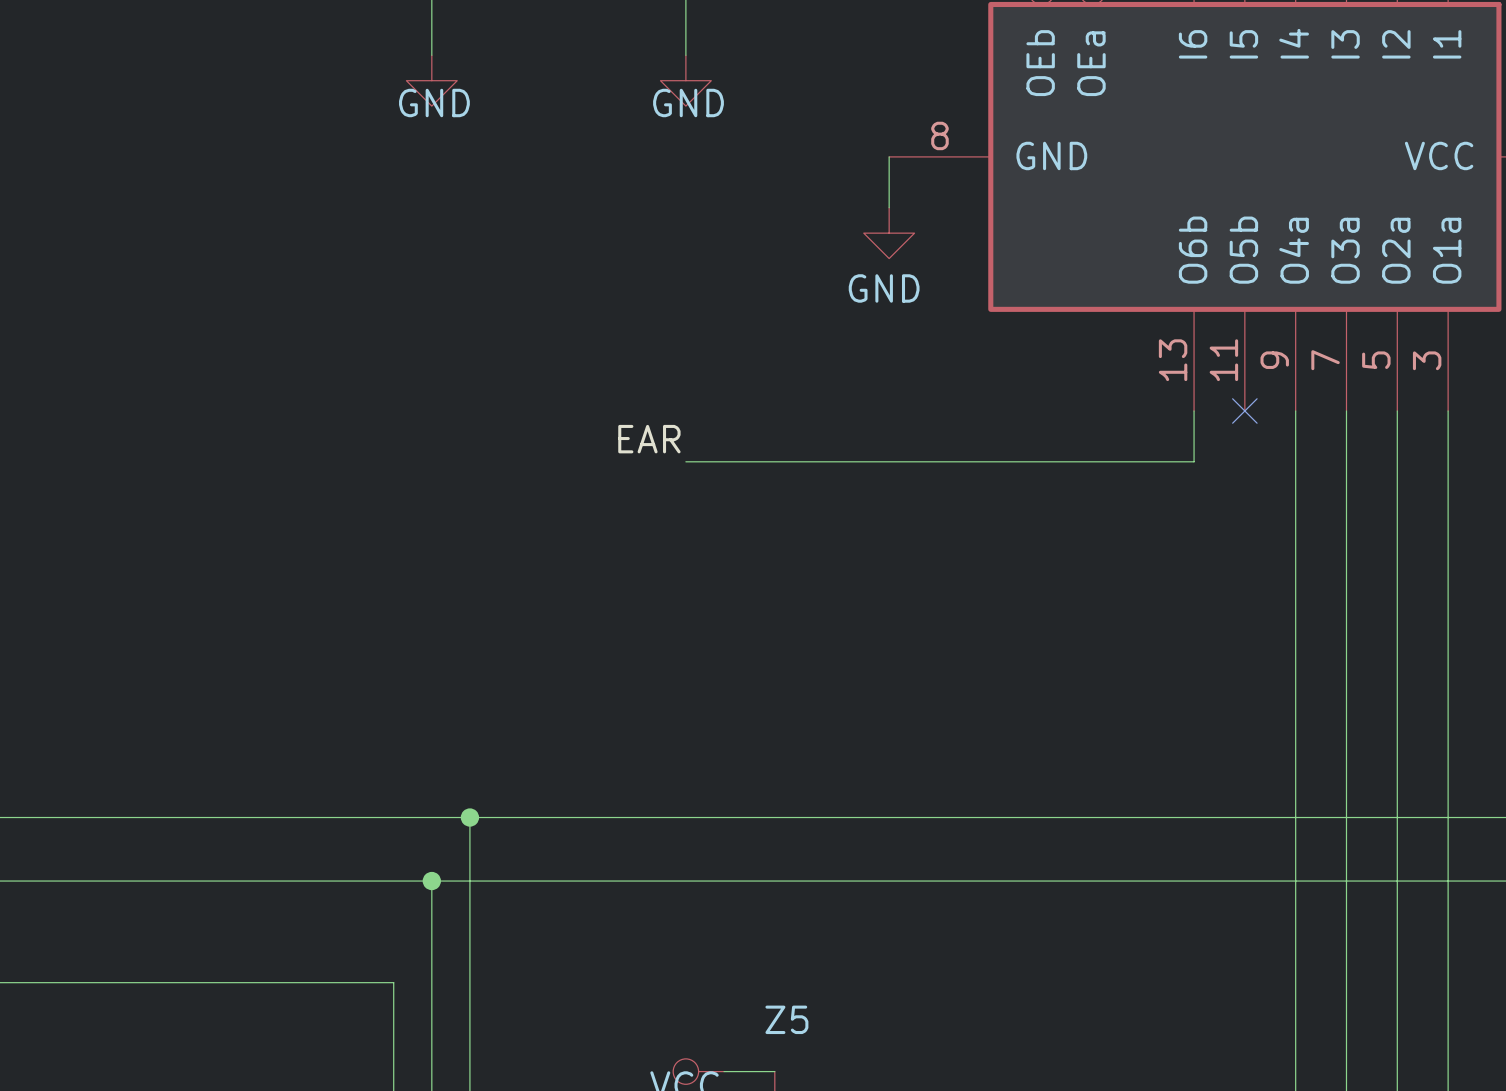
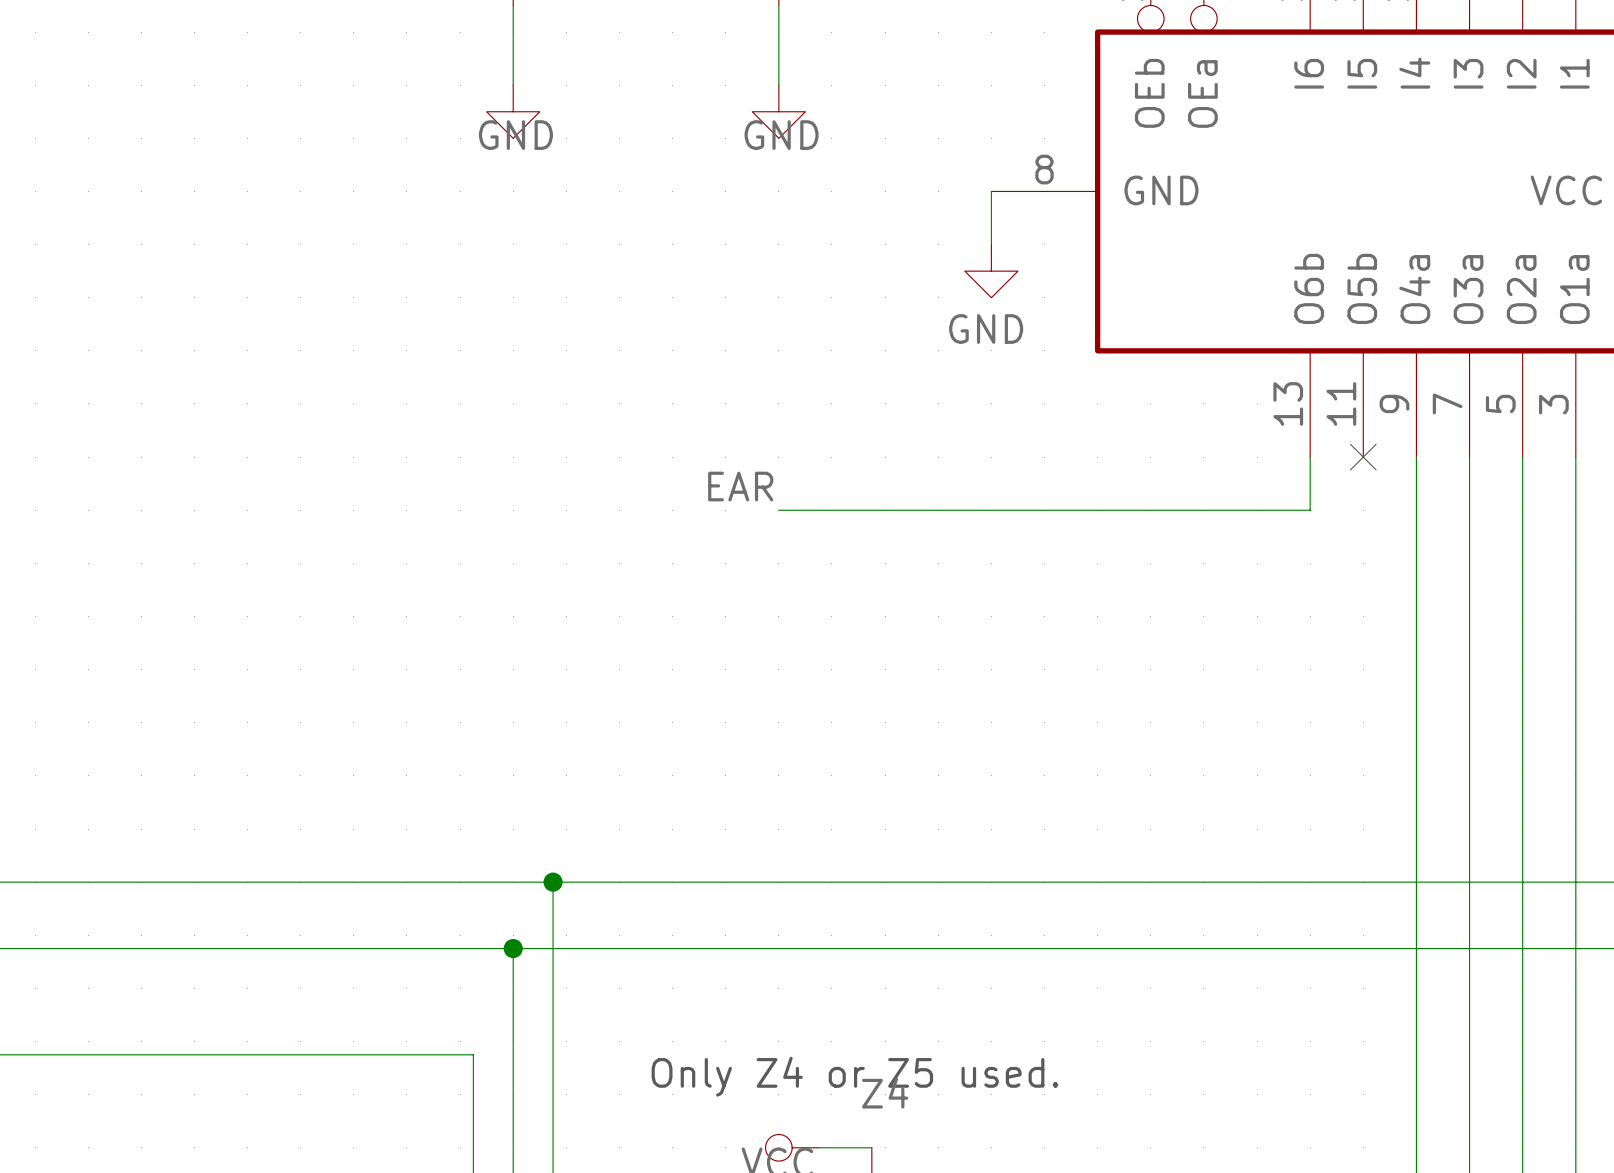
text: none -> Only Z4 or Z5 used. (854, 1076)
Z5 name: Z5 (786, 1019) -> Z4 (885, 1093)

